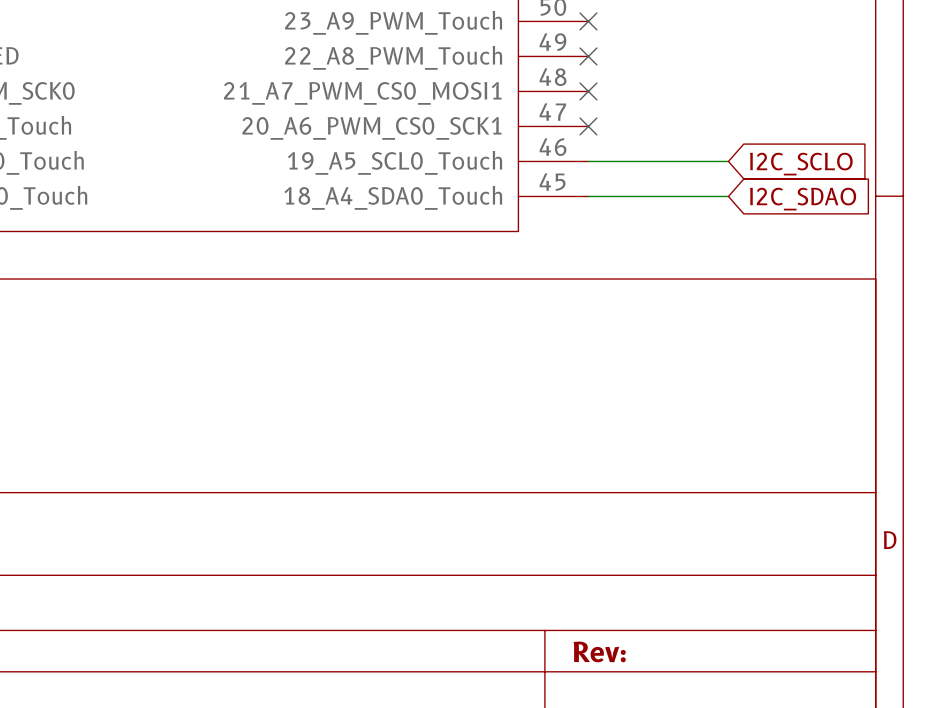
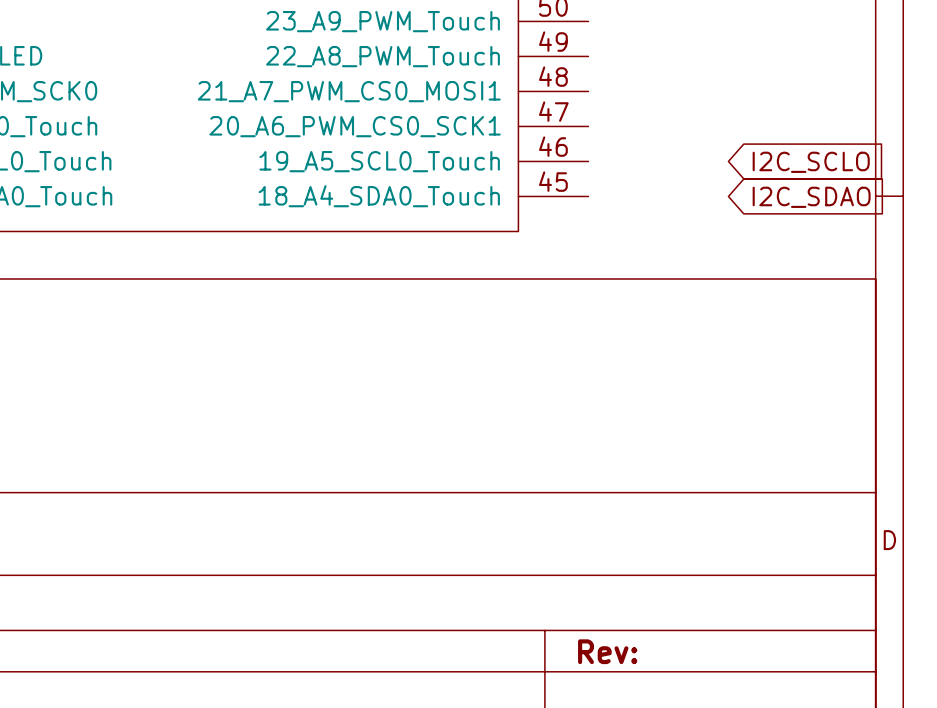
no-connect mark: (588, 21) -> none
no-connect mark: (588, 56) -> none
no-connect mark: (588, 91) -> none
no-connect mark: (588, 126) -> none
wire: (588, 161) (728, 161) -> none
wire: (588, 196) (728, 196) -> none

